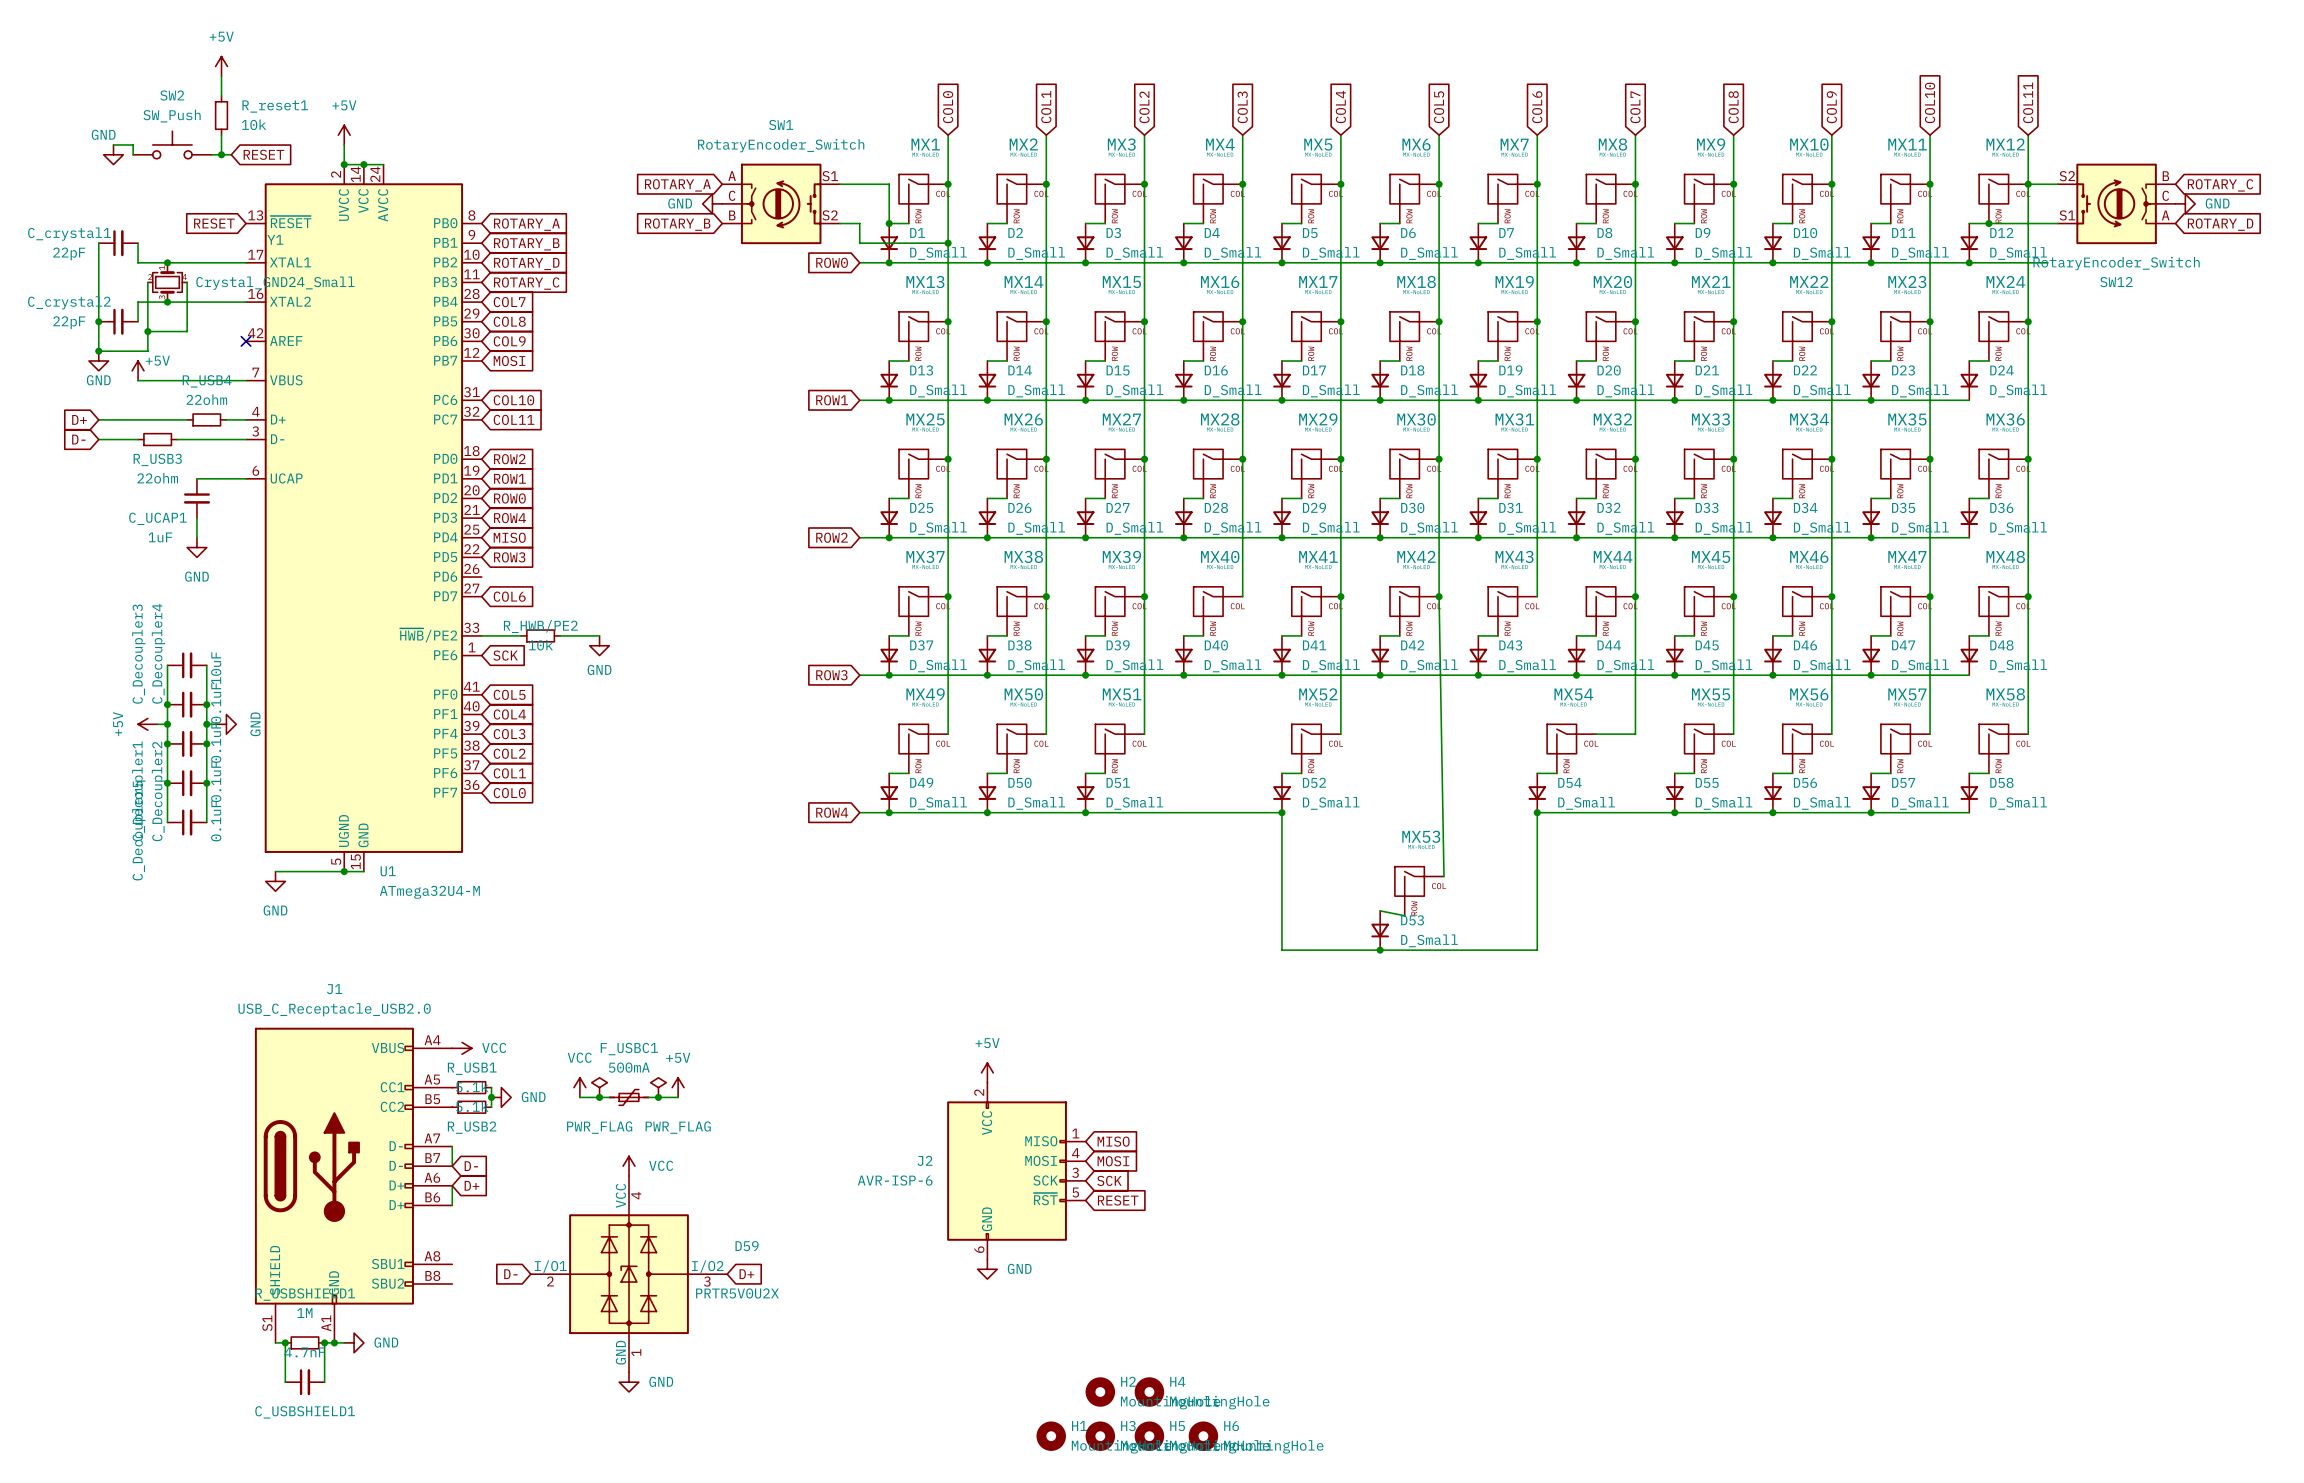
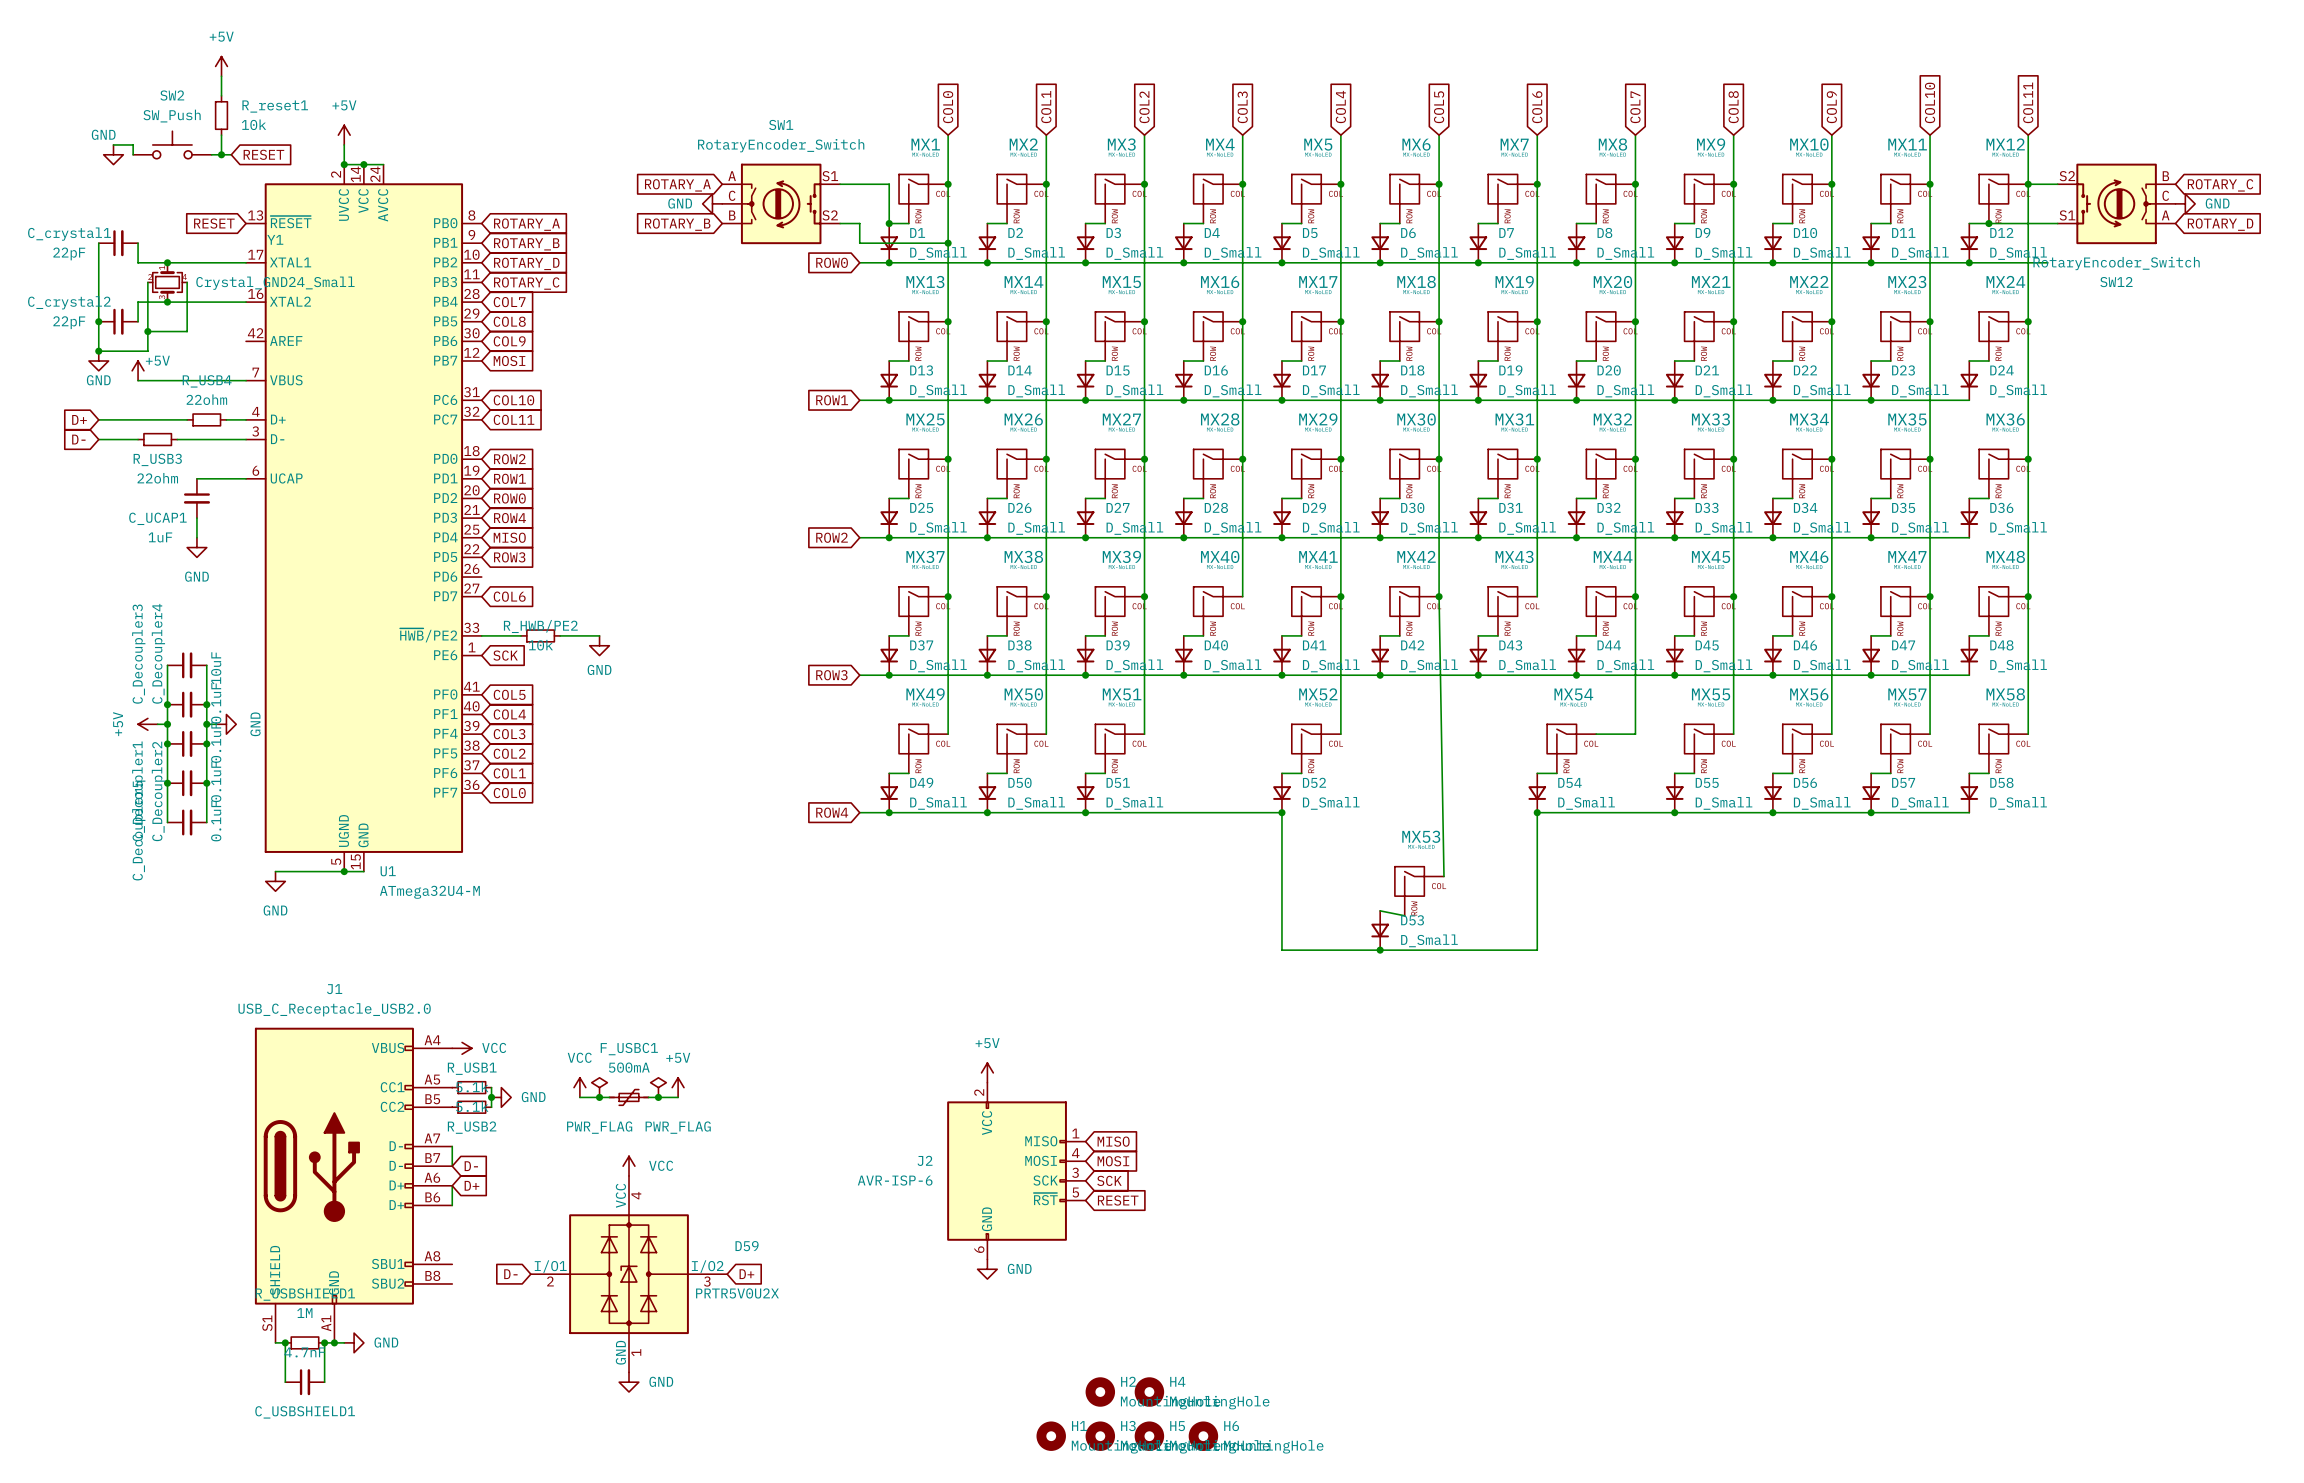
no-connect mark: (246, 341) -> none

